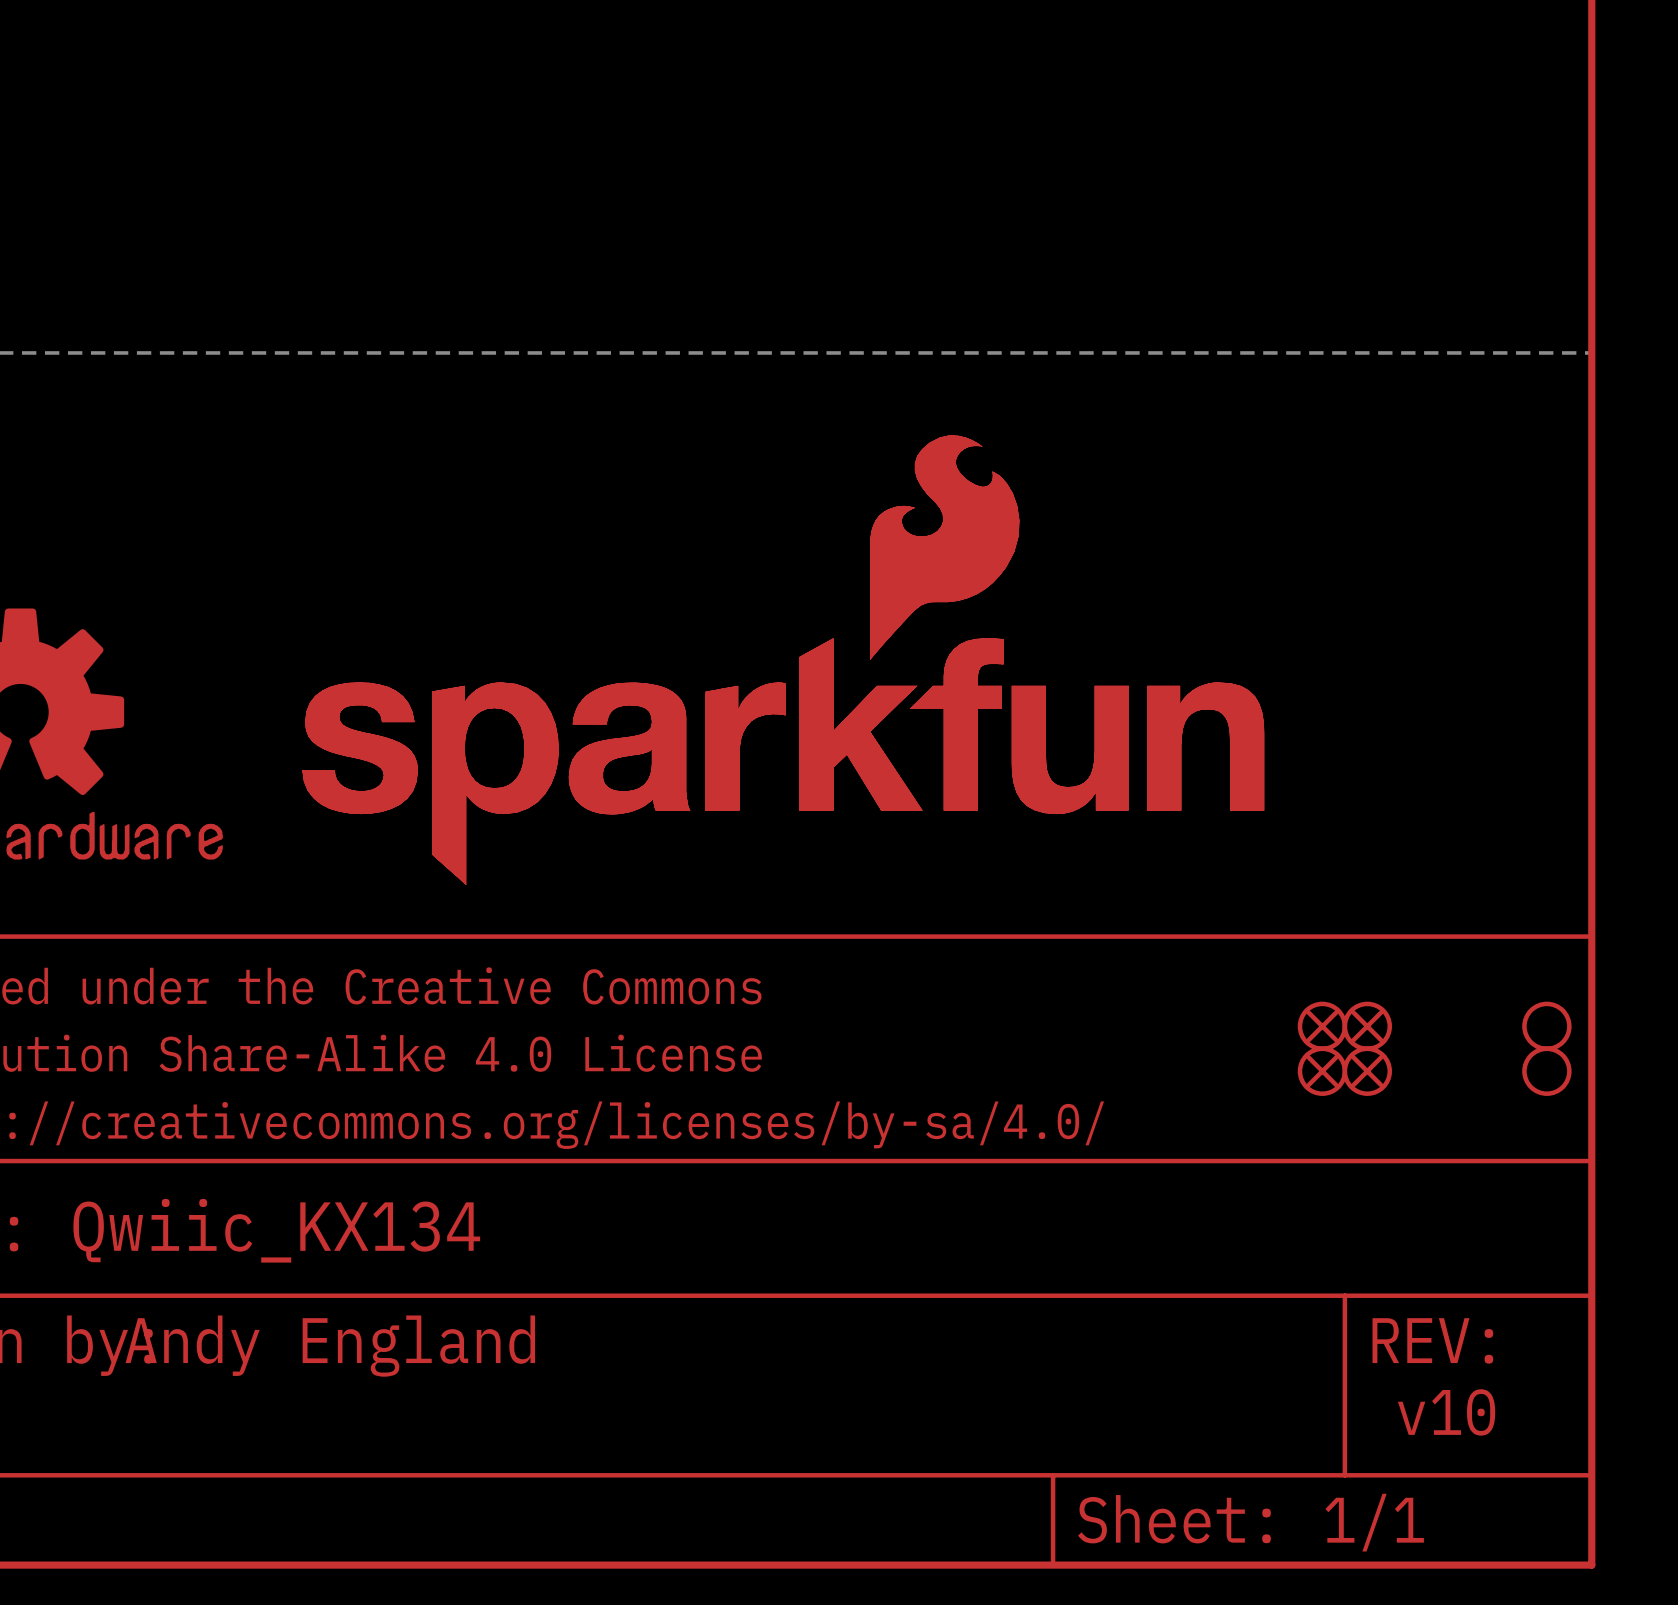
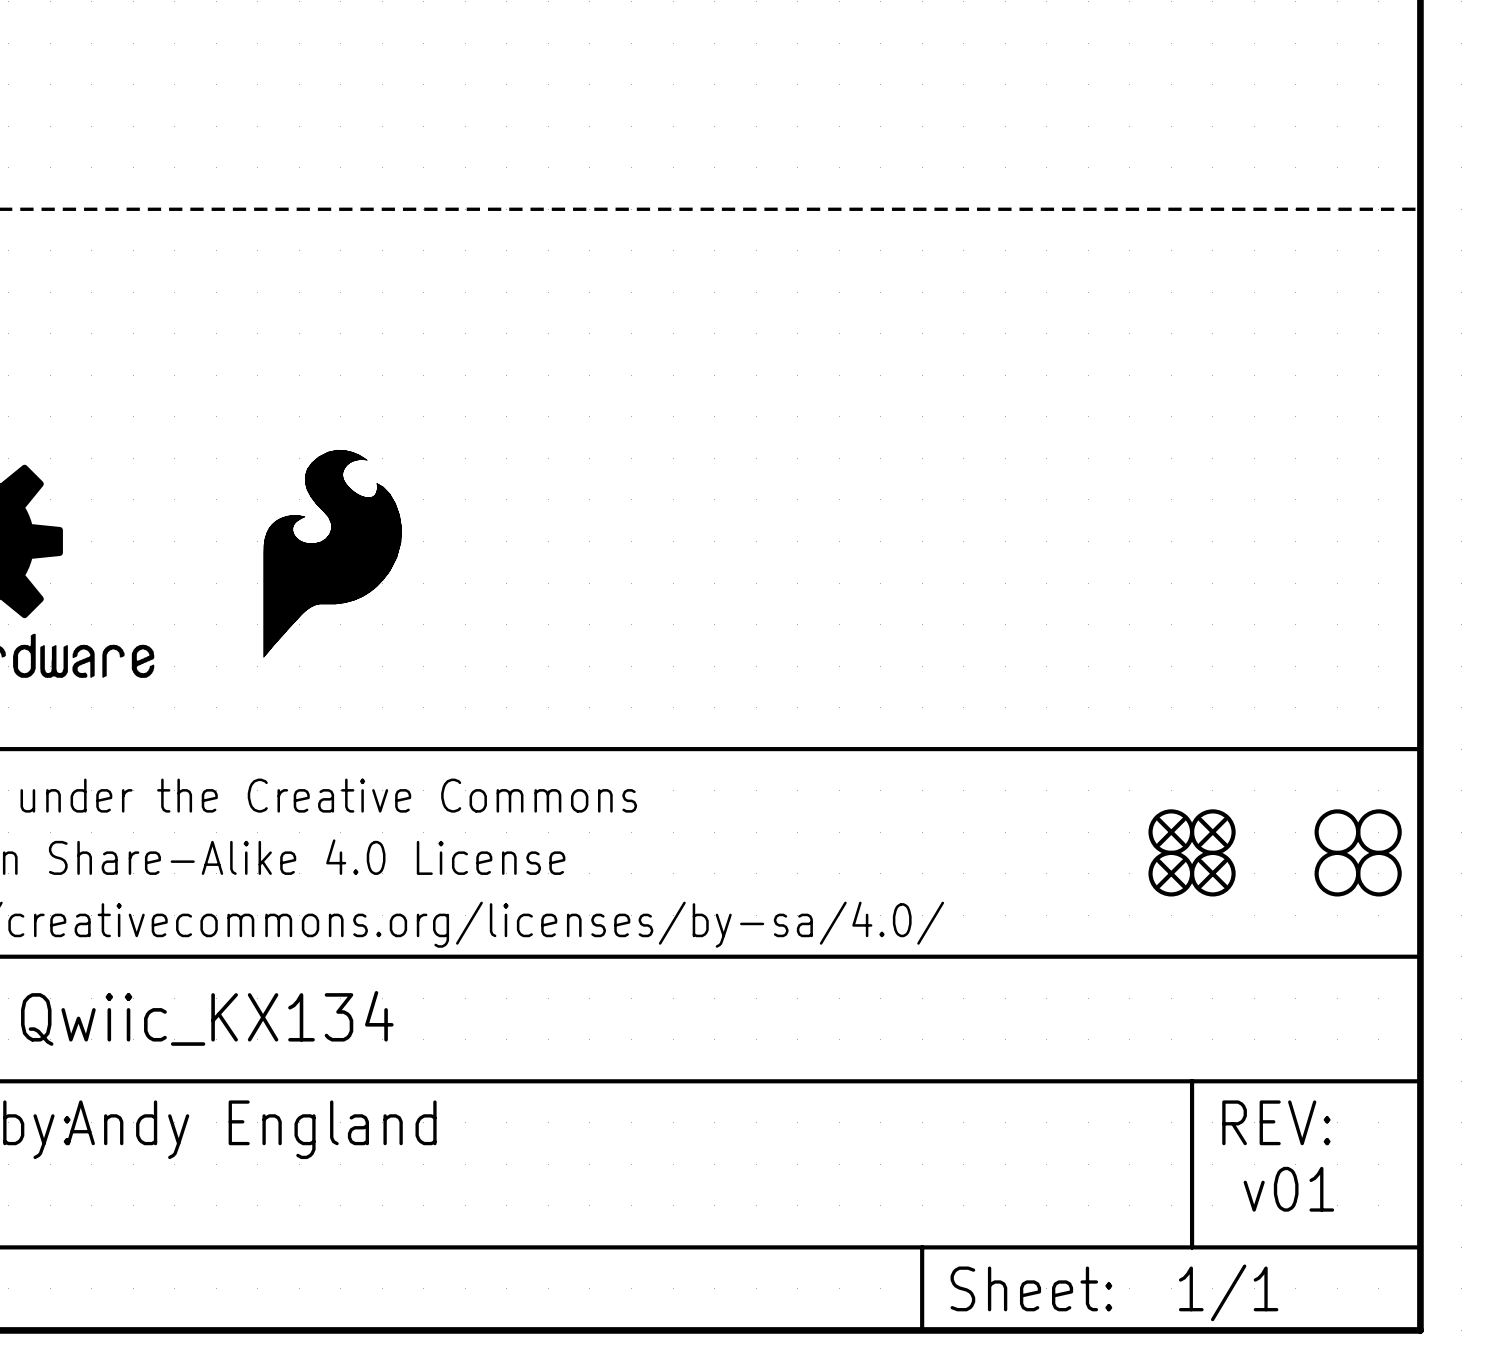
part: (783, 660) -> none
part: none -> (332, 553)
part: none -> (1337, 832)
part: none -> (1337, 873)
text: v10 (1446, 1412) -> v01 (1288, 1189)

